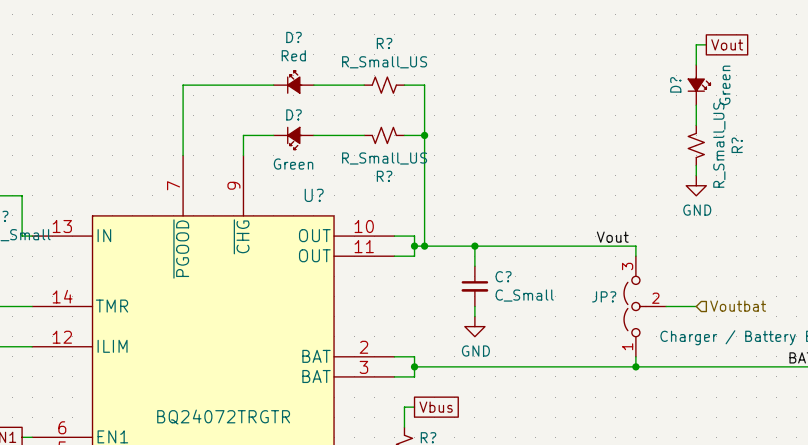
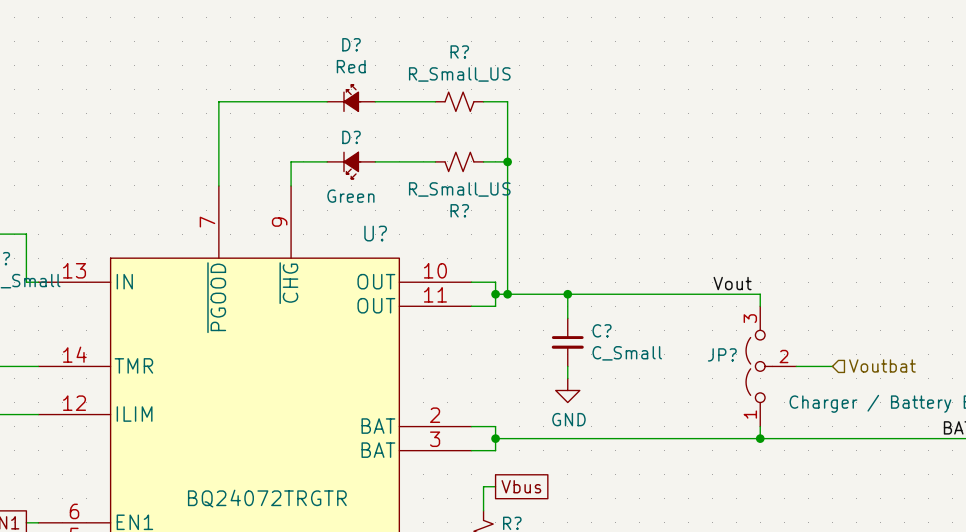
wire: (706, 44) (696, 44) (696, 64) -> none
global label: Vout (727, 44) -> none
D?: Green (699, 85) -> none
wire: (696, 105) (696, 125) -> none
R?: R_Small_US (696, 145) -> none
wire: (696, 165) (696, 175) -> none
power symbol: GND (696, 185) -> none

